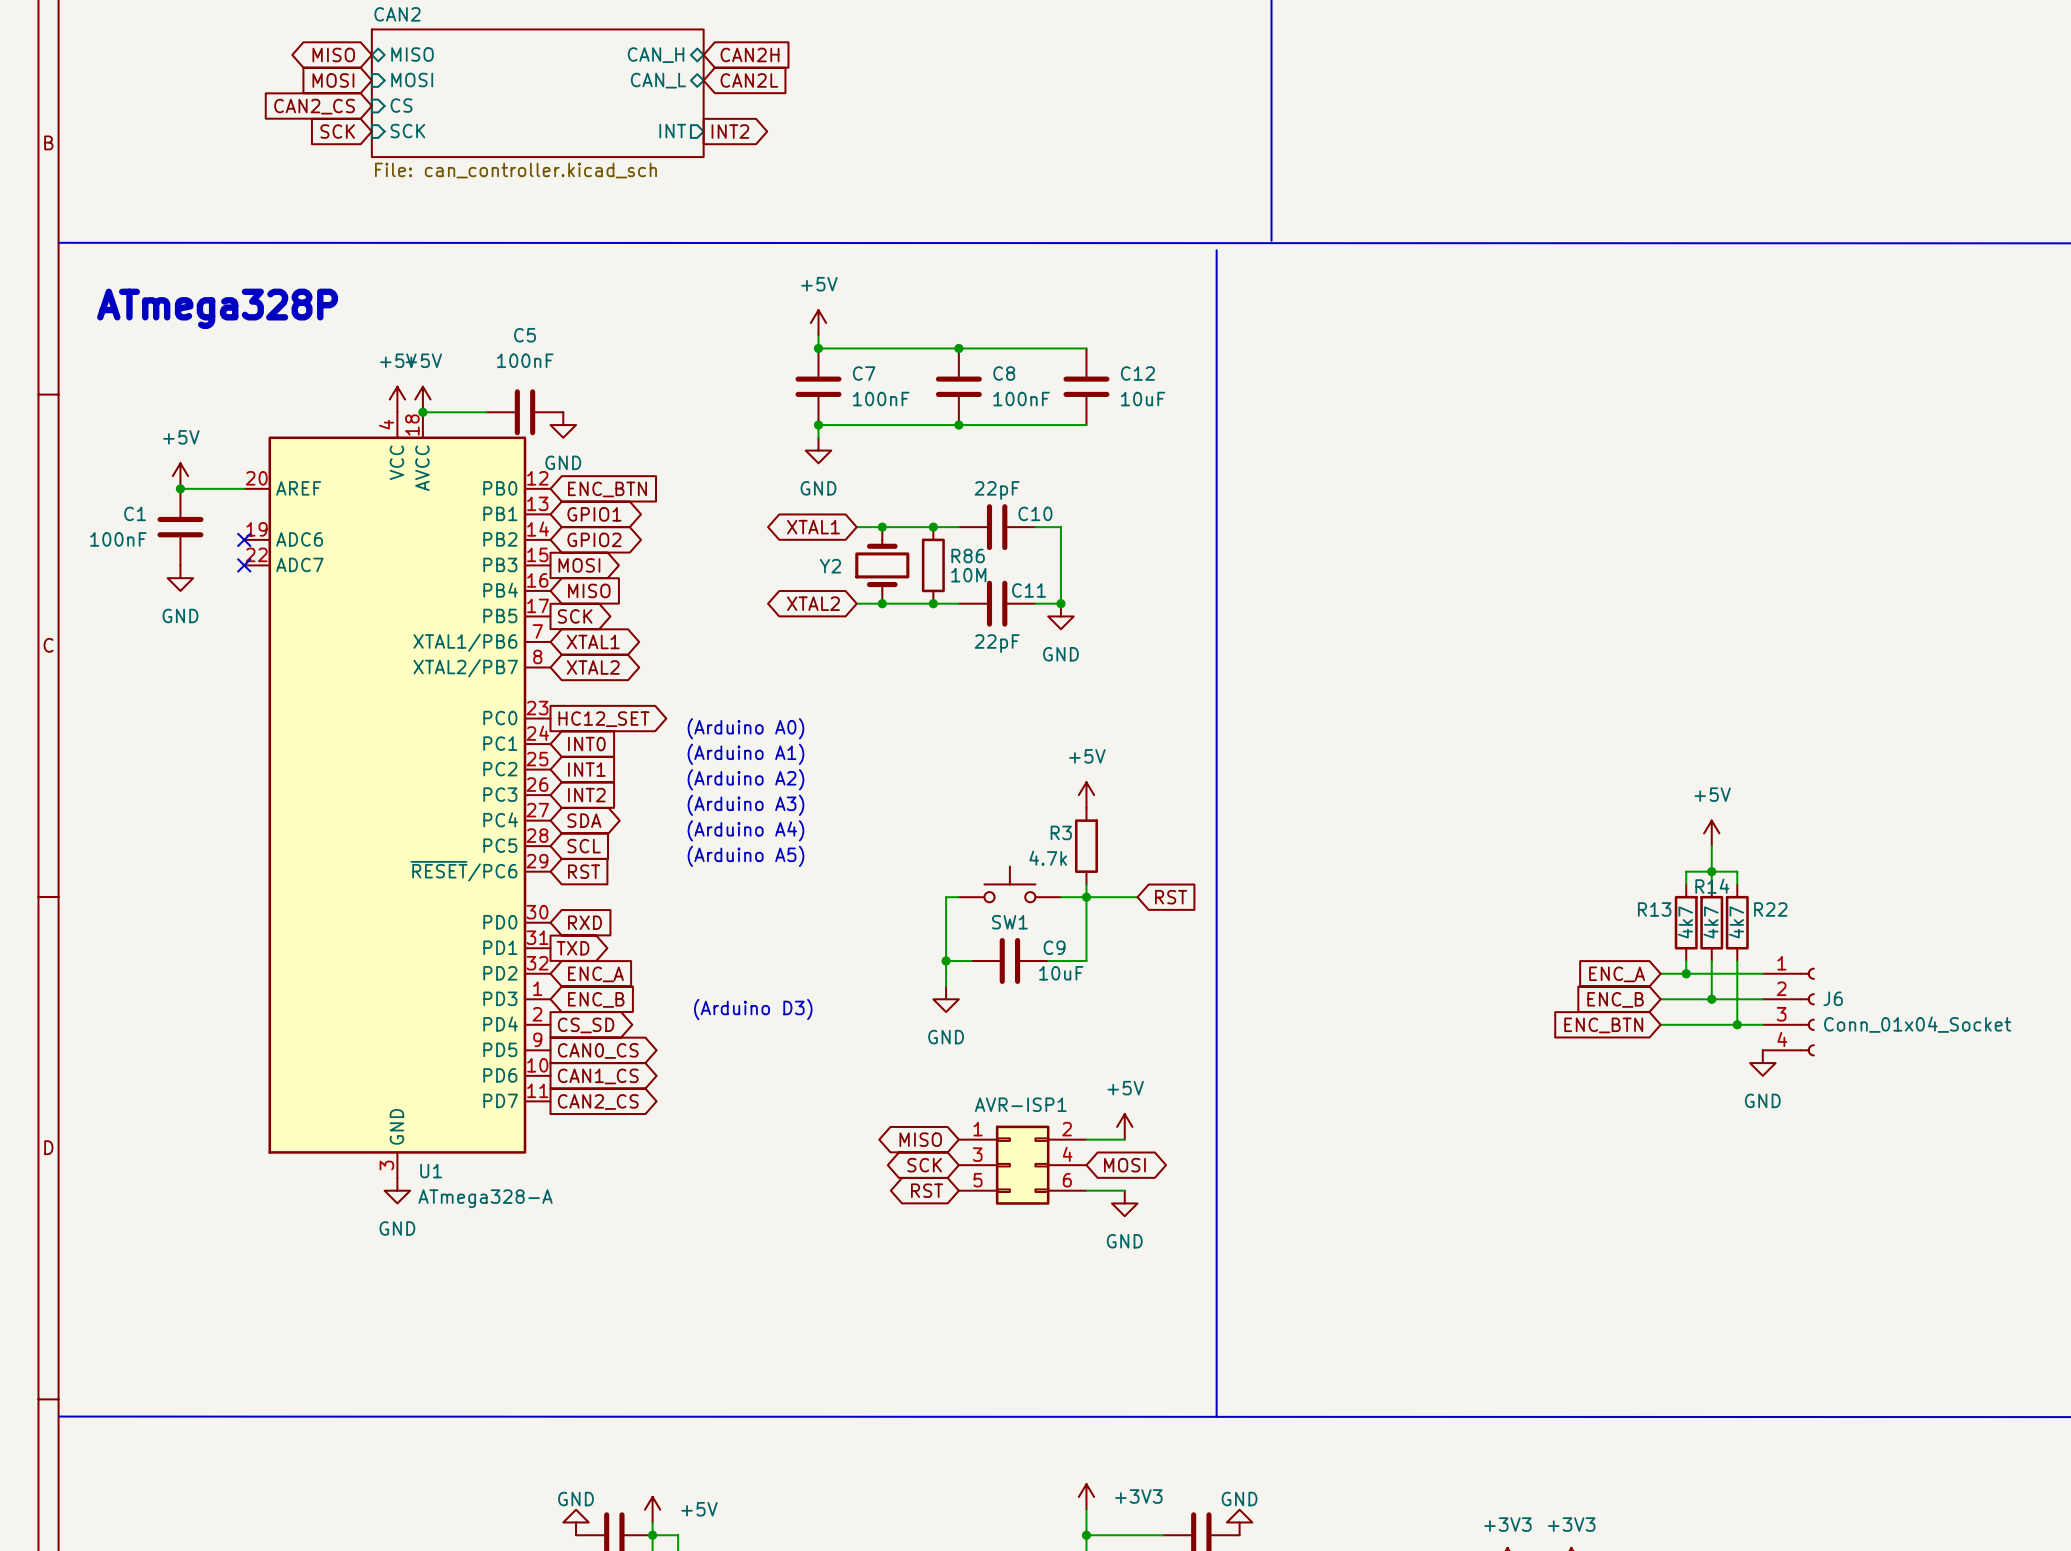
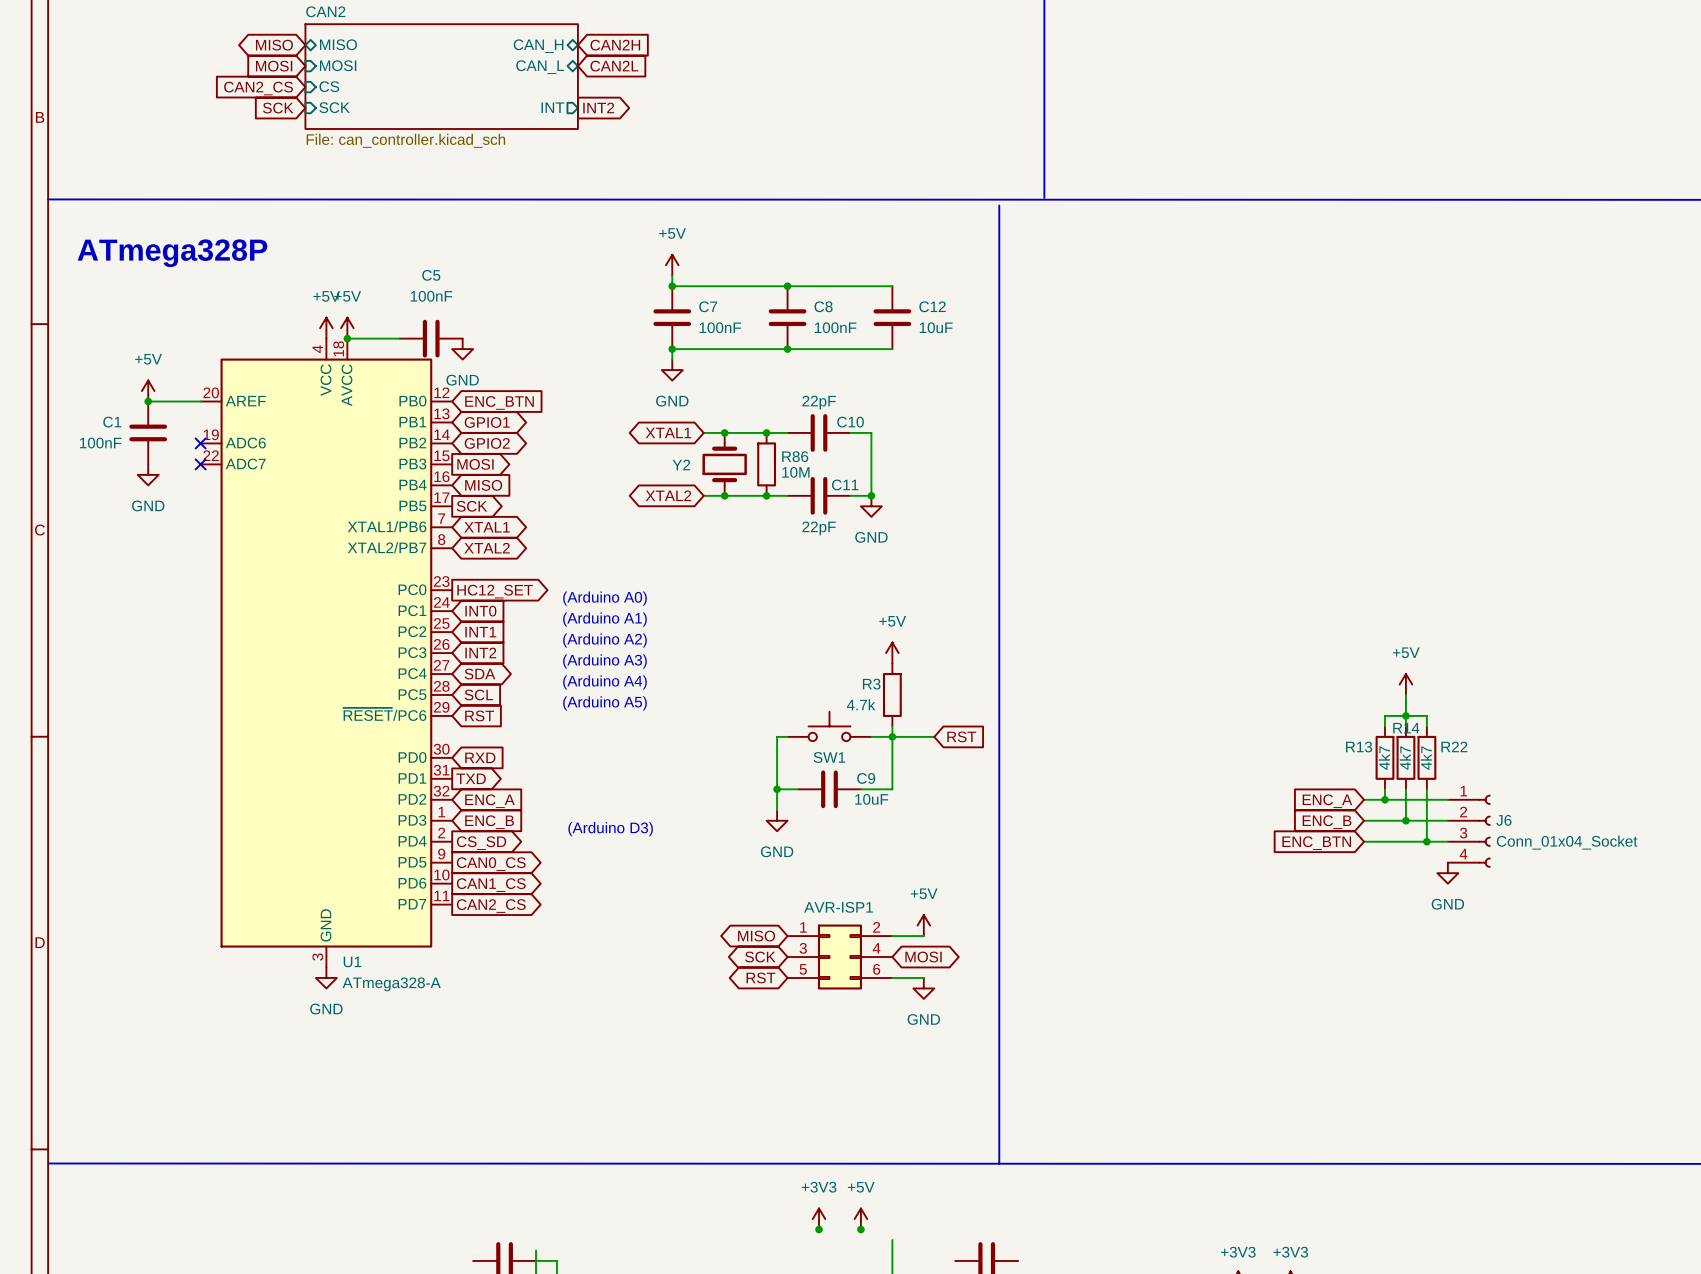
power symbol: none -> +5V (860, 1219)
junction: none -> (819, 1229)
junction: none -> (860, 1229)
power symbol position: +3V3 (1086, 1496) -> +3V3 (819, 1219)
power symbol text position: +3V3 (1138, 1496) -> +3V3 (819, 1187)
power symbol: +5V (652, 1509) -> none
power symbol: GND (576, 1522) -> none
power symbol: GND (1239, 1522) -> none
junction: (652, 1535) -> none
wire: (1086, 1535) (1163, 1535) -> none
junction: (1086, 1535) -> none

